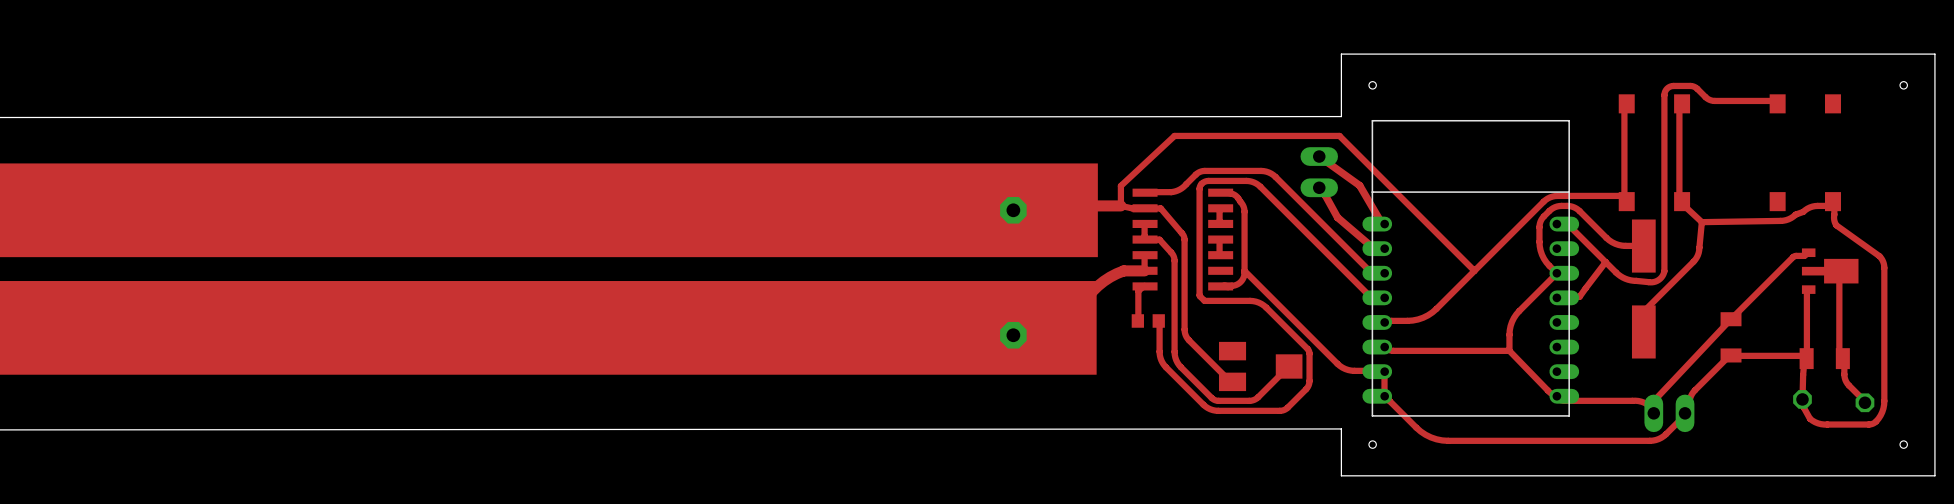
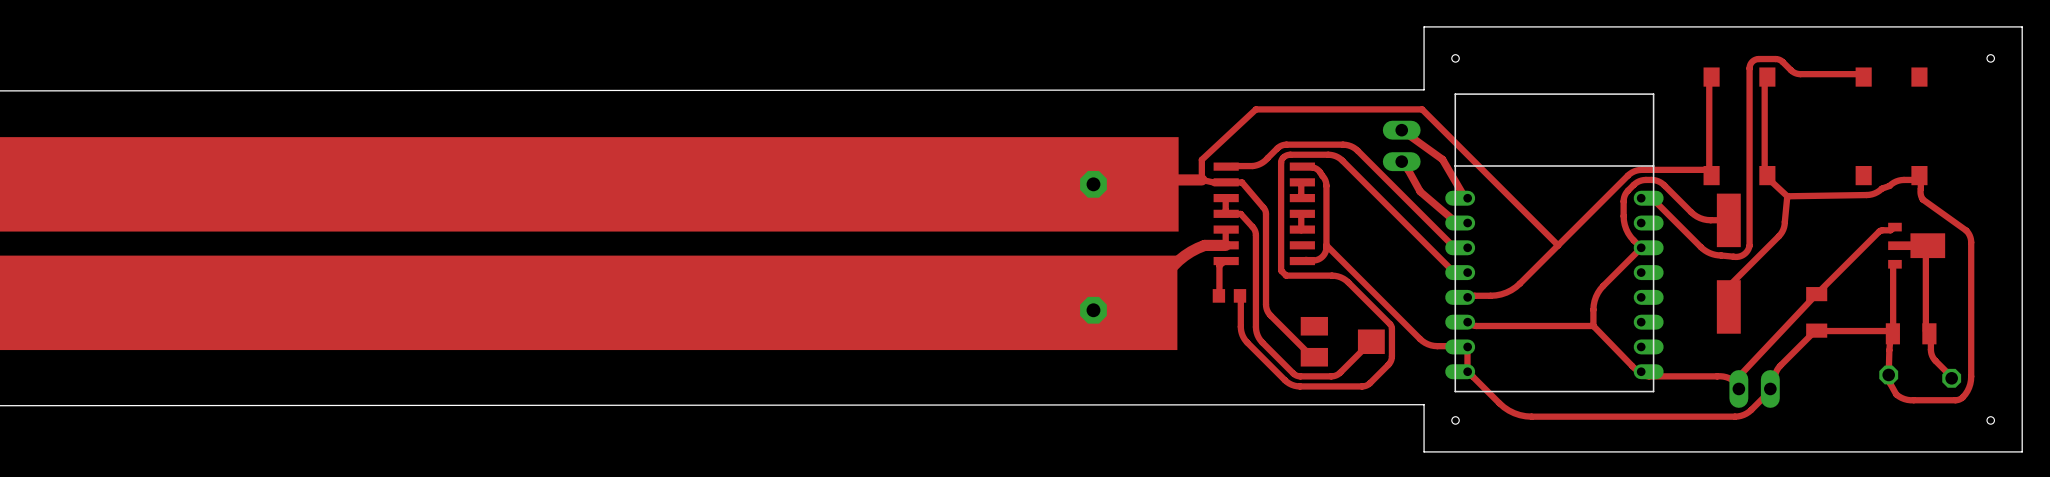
top track: (1605, 262) (1579, 296) (1556, 297) -> none

